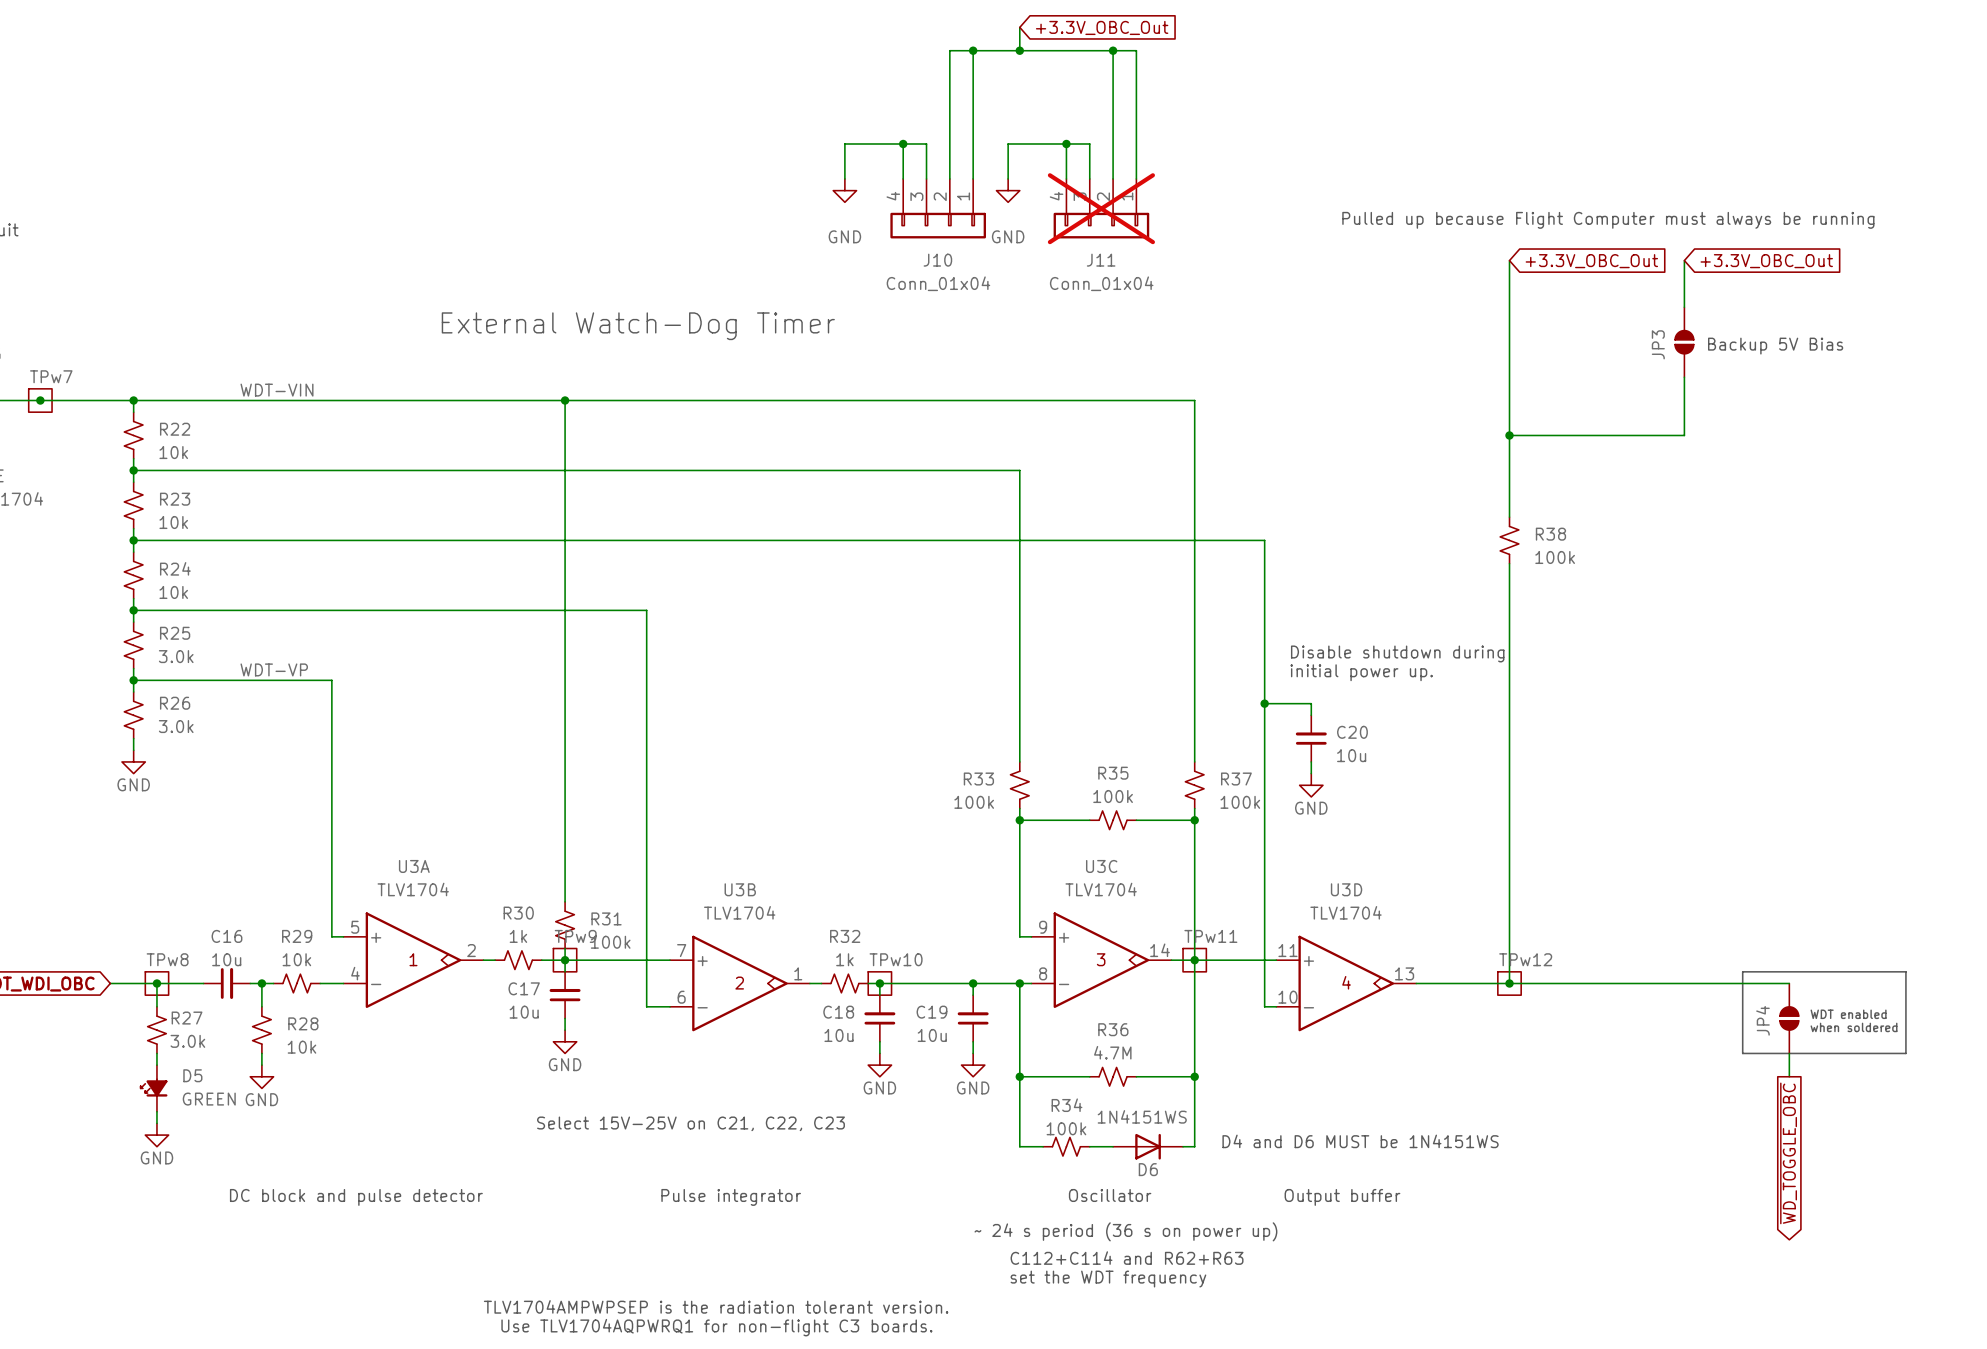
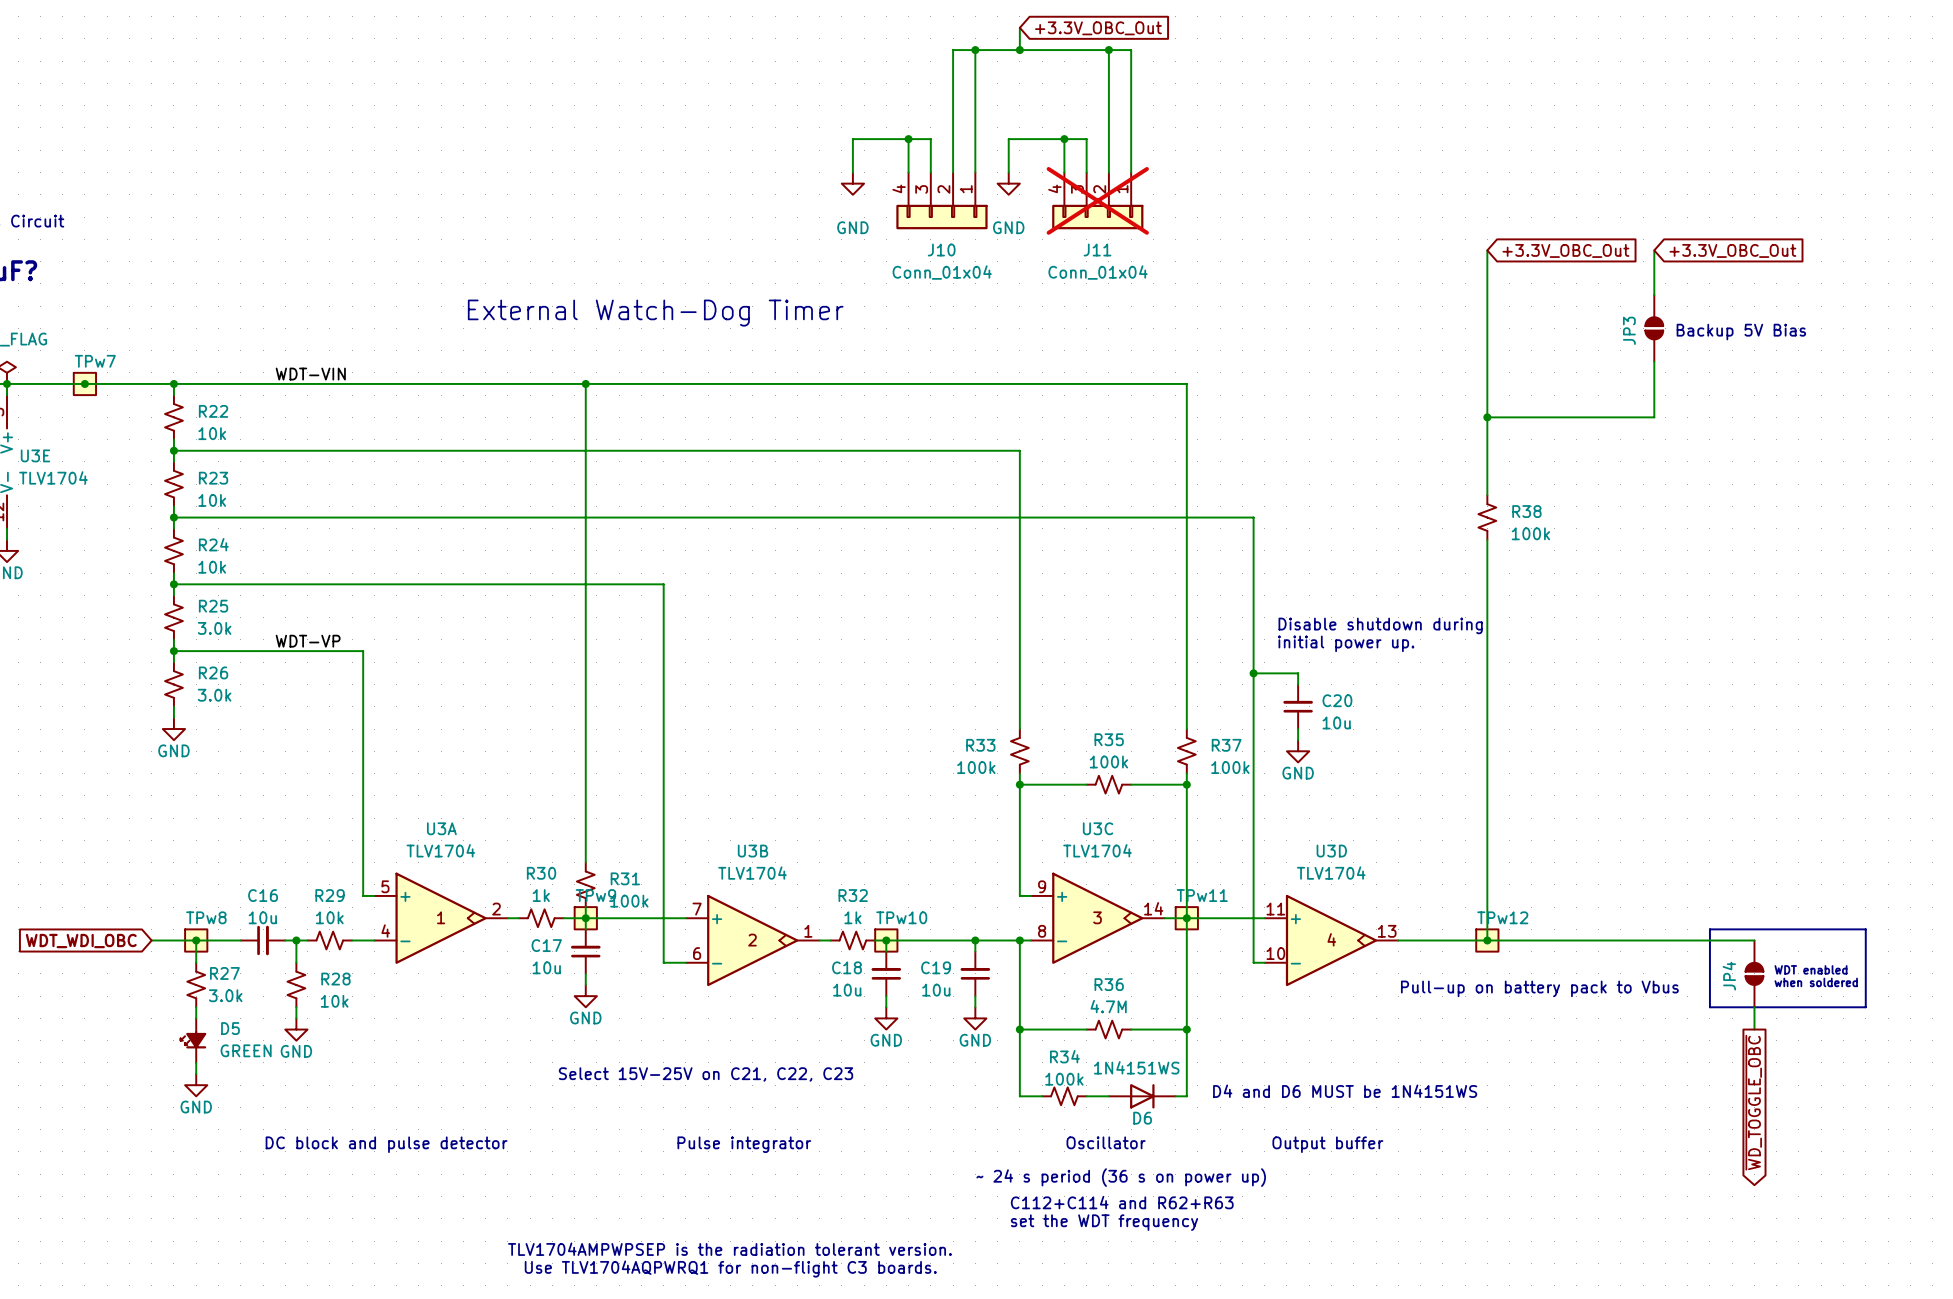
text: Pulled up because Flight Computer must always be running (1608, 220) -> none
text: none -> Pull-up on battery pack to Vbus (1539, 988)

